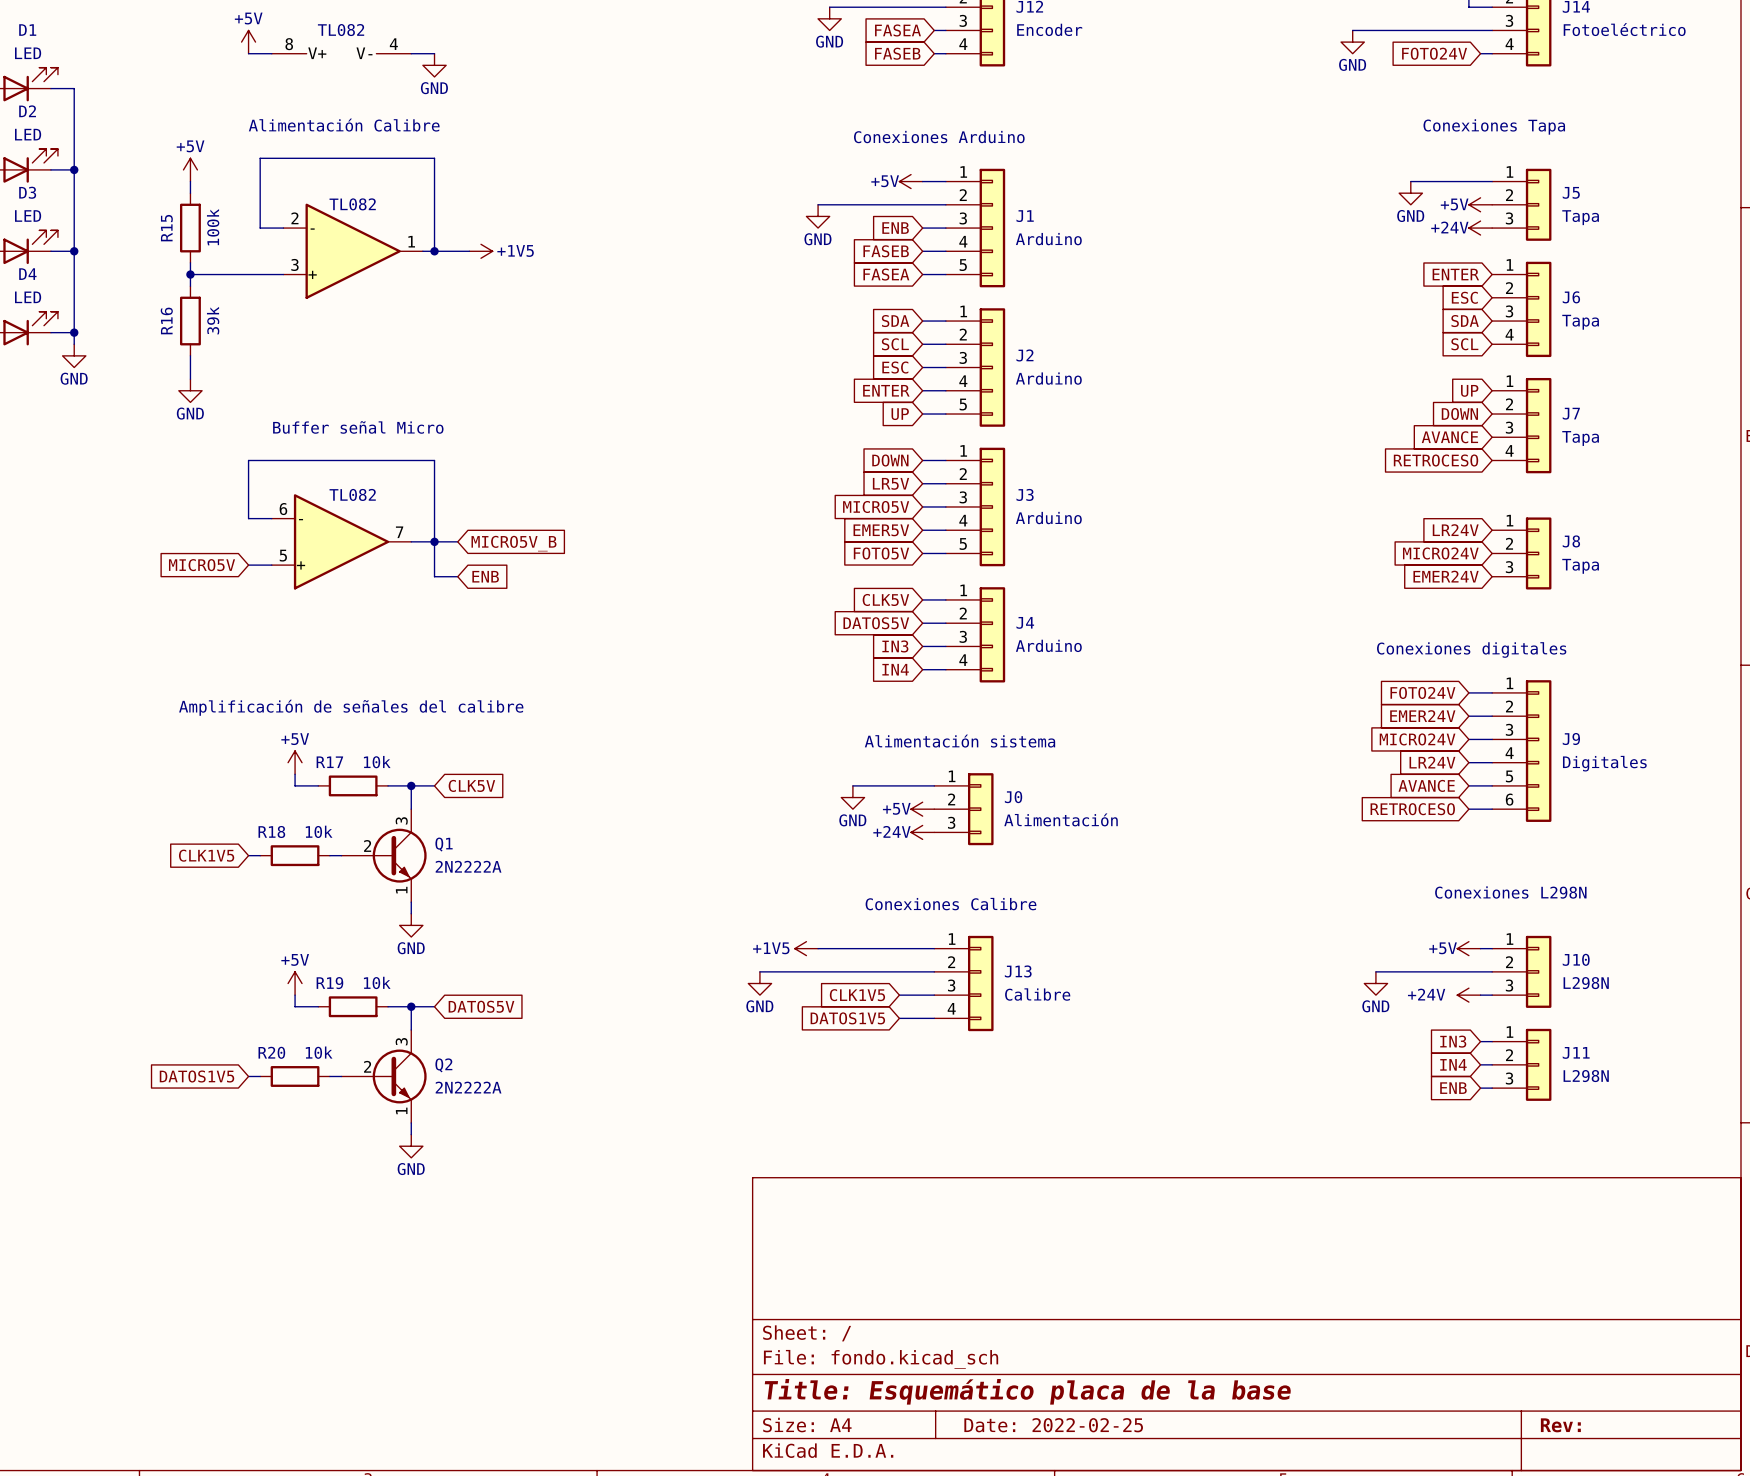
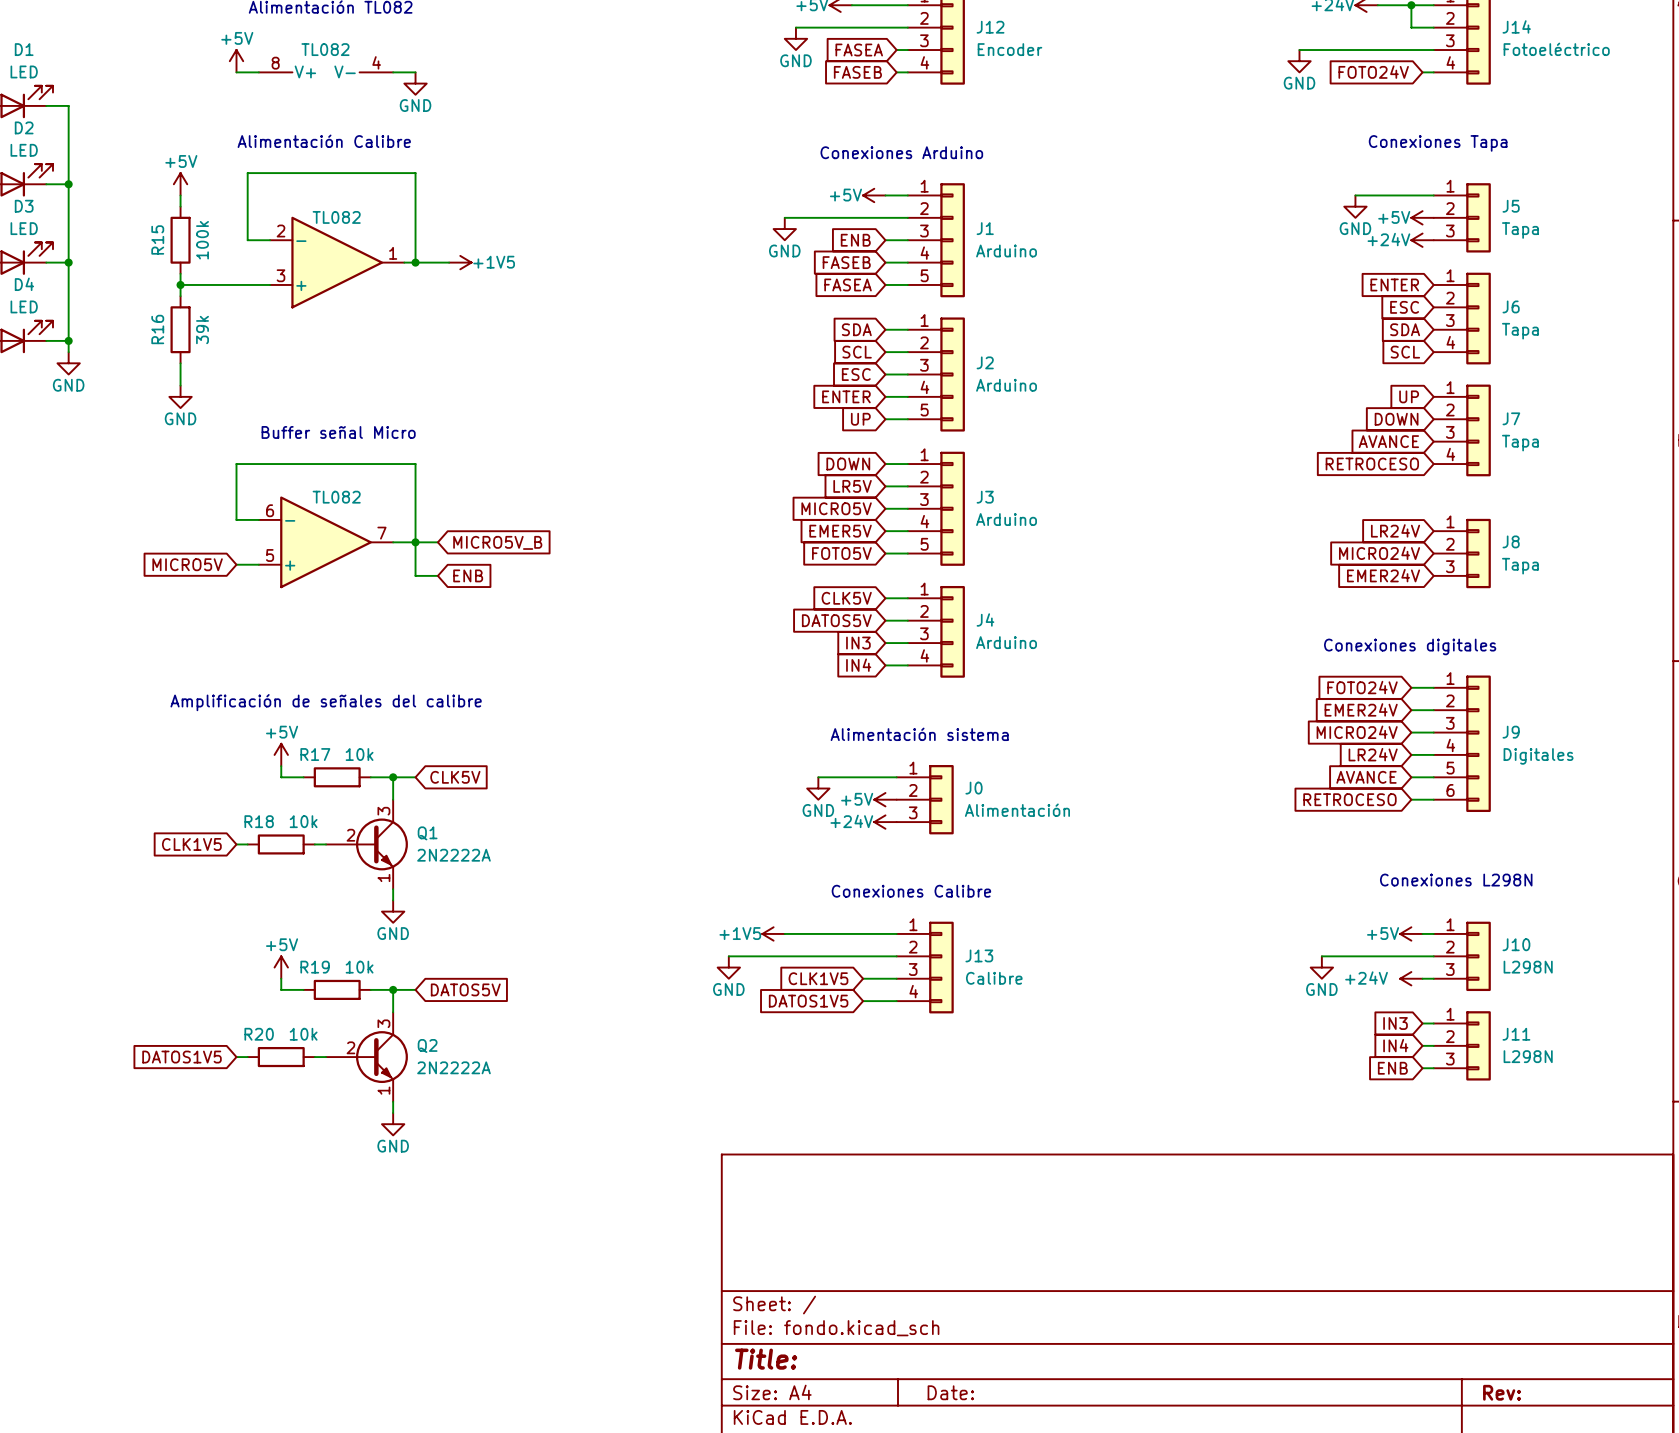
title block: Title: Esquemático placa de la base (1027, 1391) -> Title: (766, 1359)
title block: Date: 2022-02-25 (1053, 1425) -> Date: (950, 1392)

